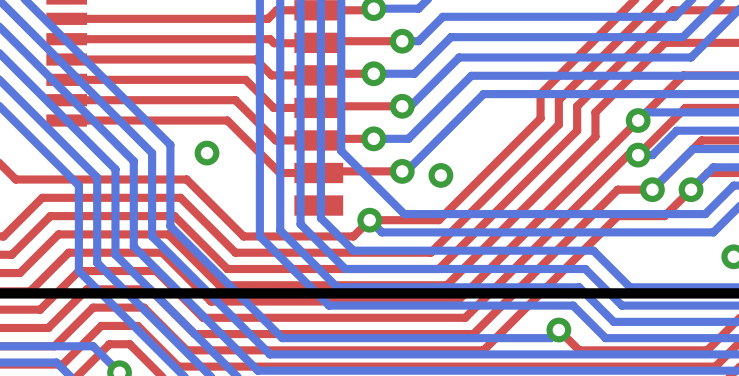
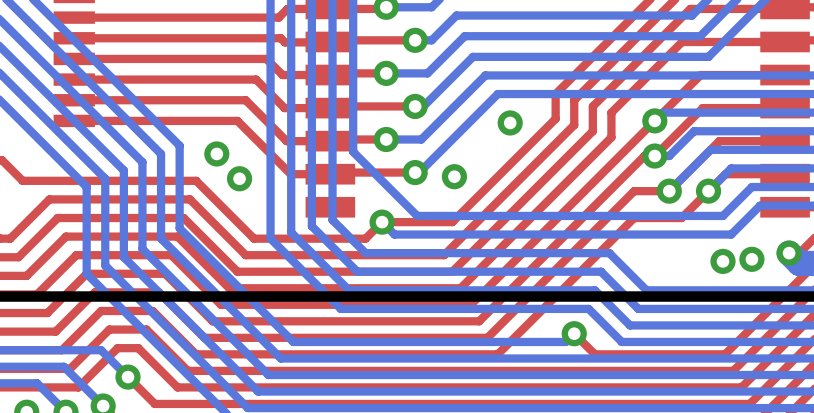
via: none -> (510, 122)
via: none -> (239, 178)
via: none -> (722, 261)

